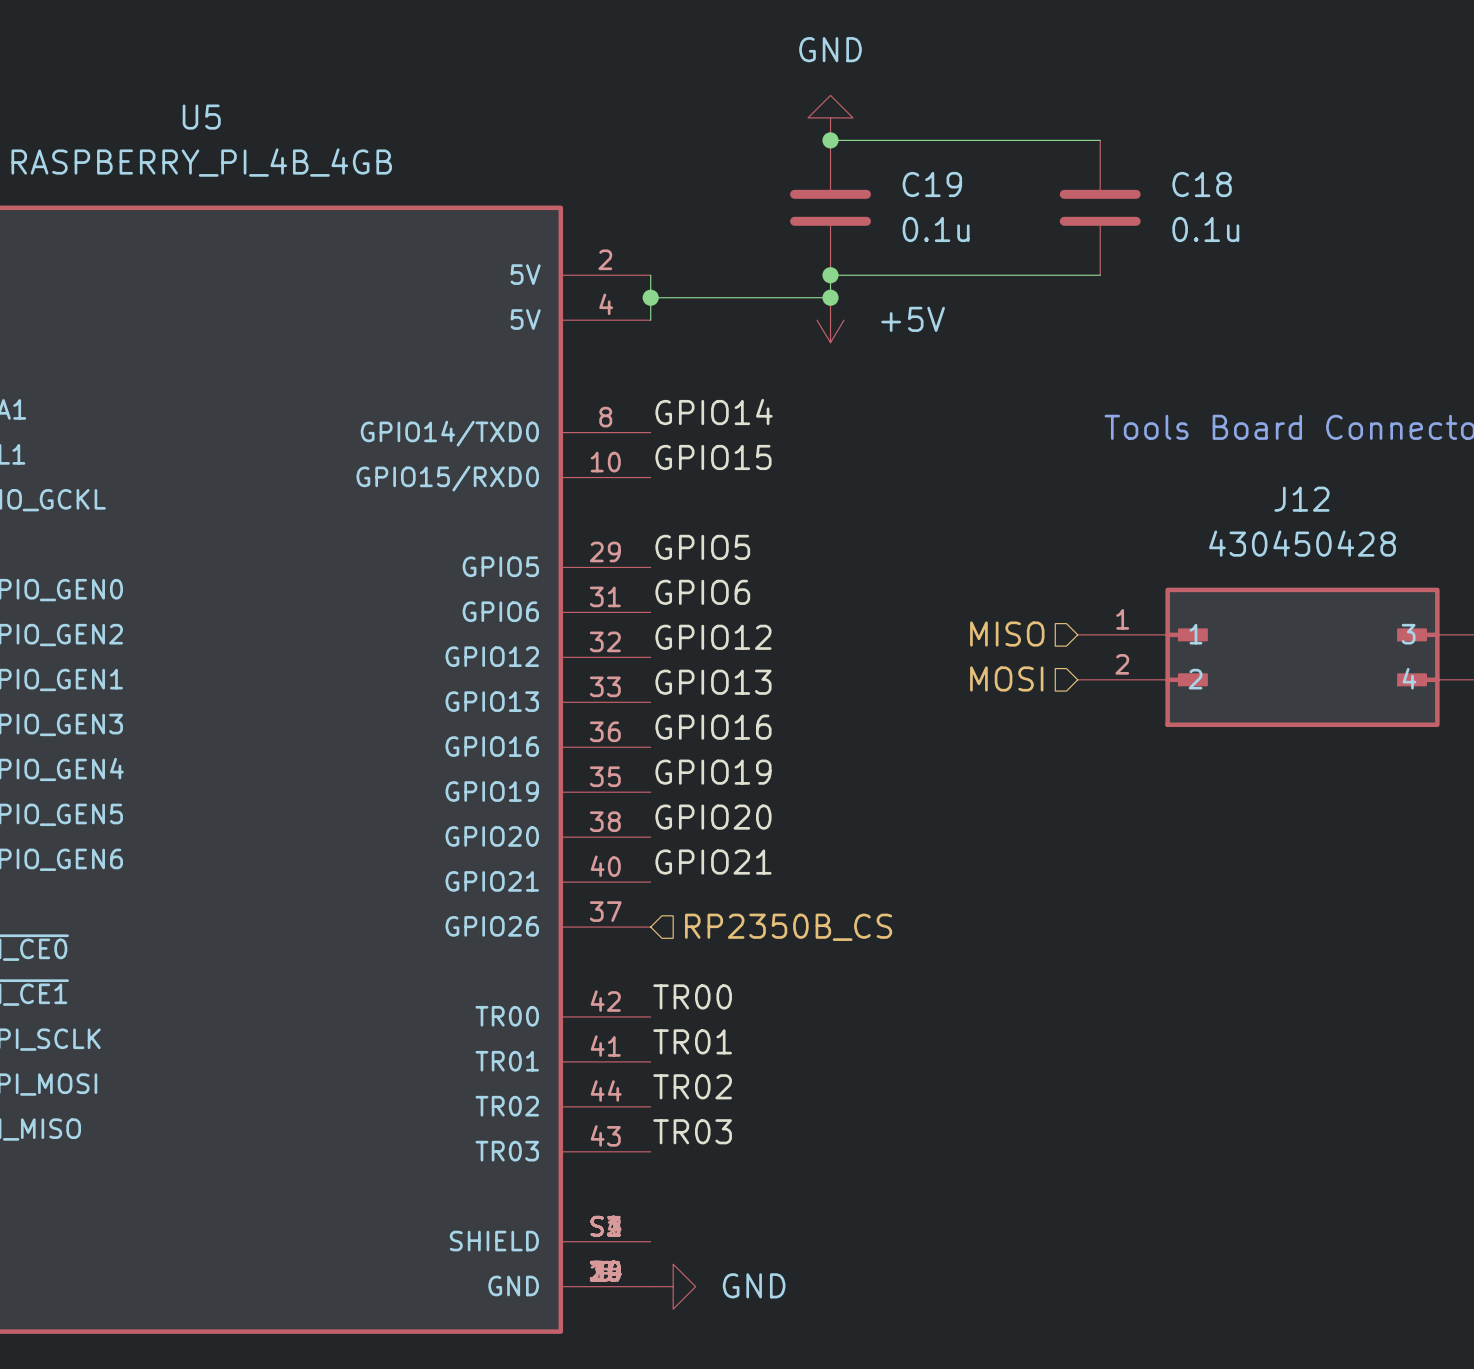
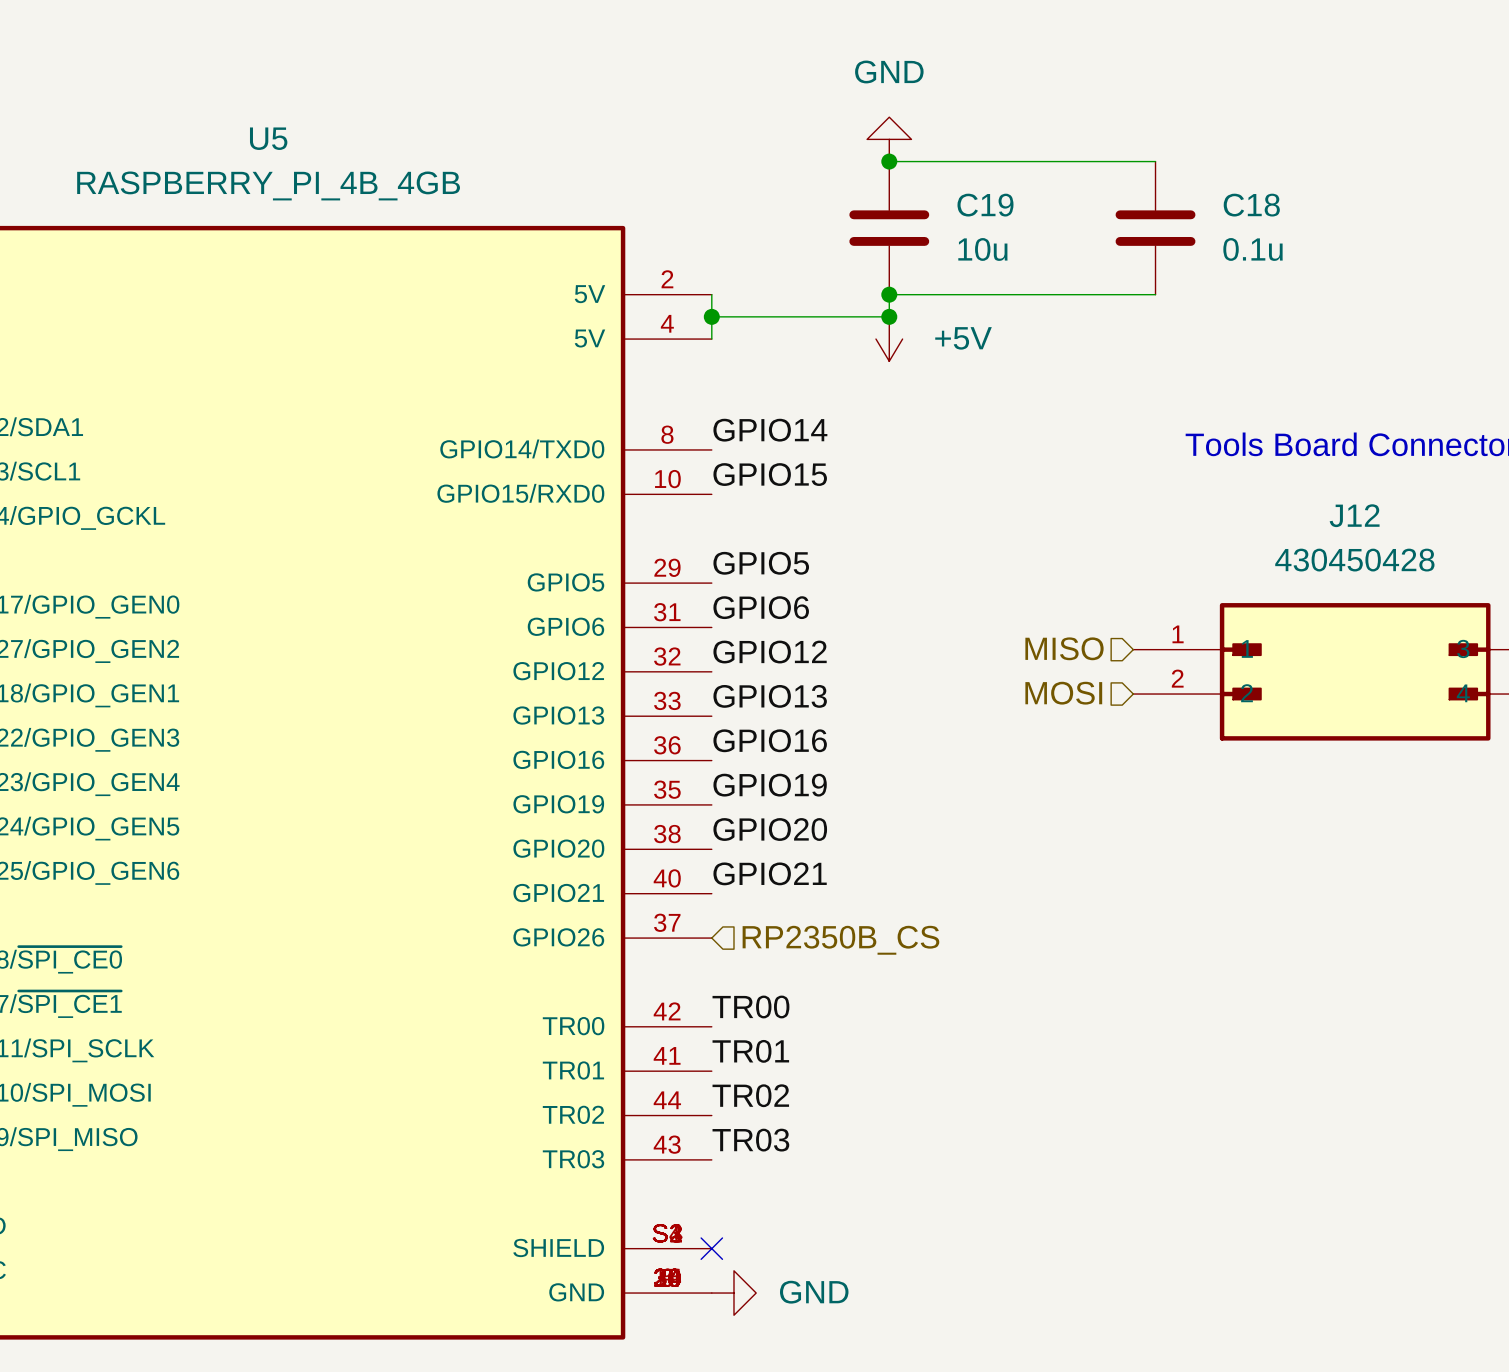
C19 value: 0.1u (936, 229) -> 10u (982, 249)
no-connect mark: none -> (711, 1248)

